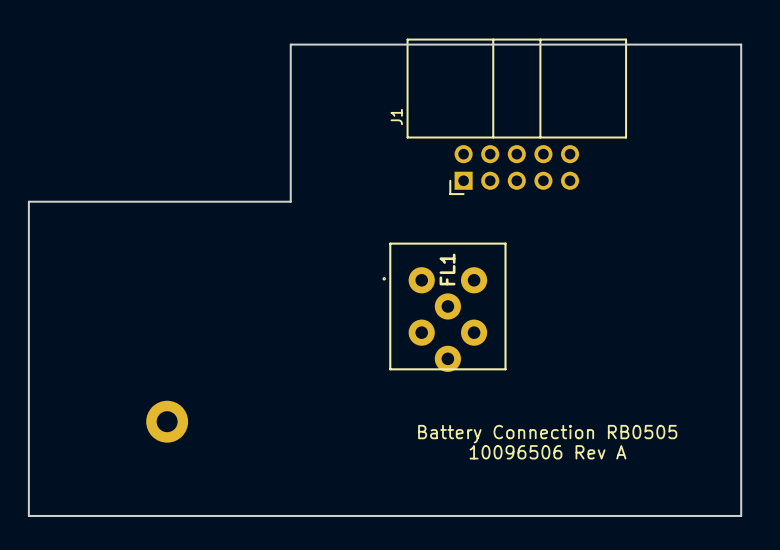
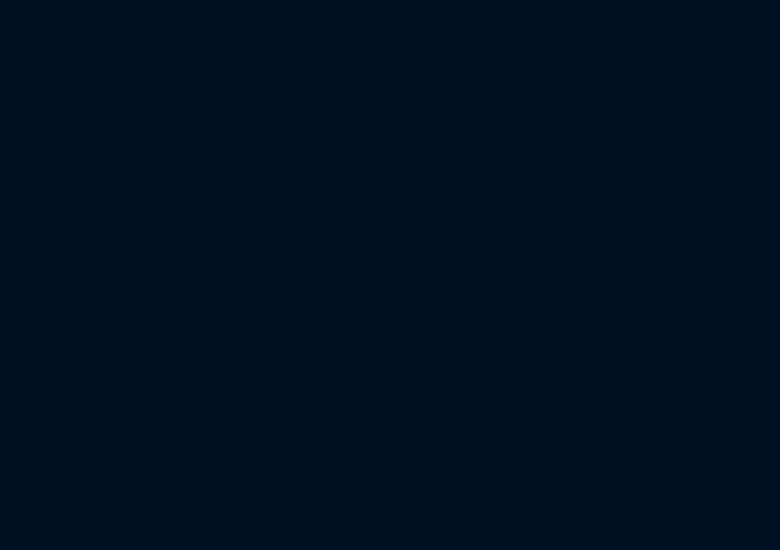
board edge: (290, 44) (741, 44) (741, 515) (28, 515) (28, 201) (290, 201) (290, 44) -> none
J1: (516, 116) -> none
FL1: (444, 307) -> none
part: (167, 421) -> none
text: Battery Connection RB0505 (547, 434) -> none
text: 10096506 Rev A (548, 452) -> none

